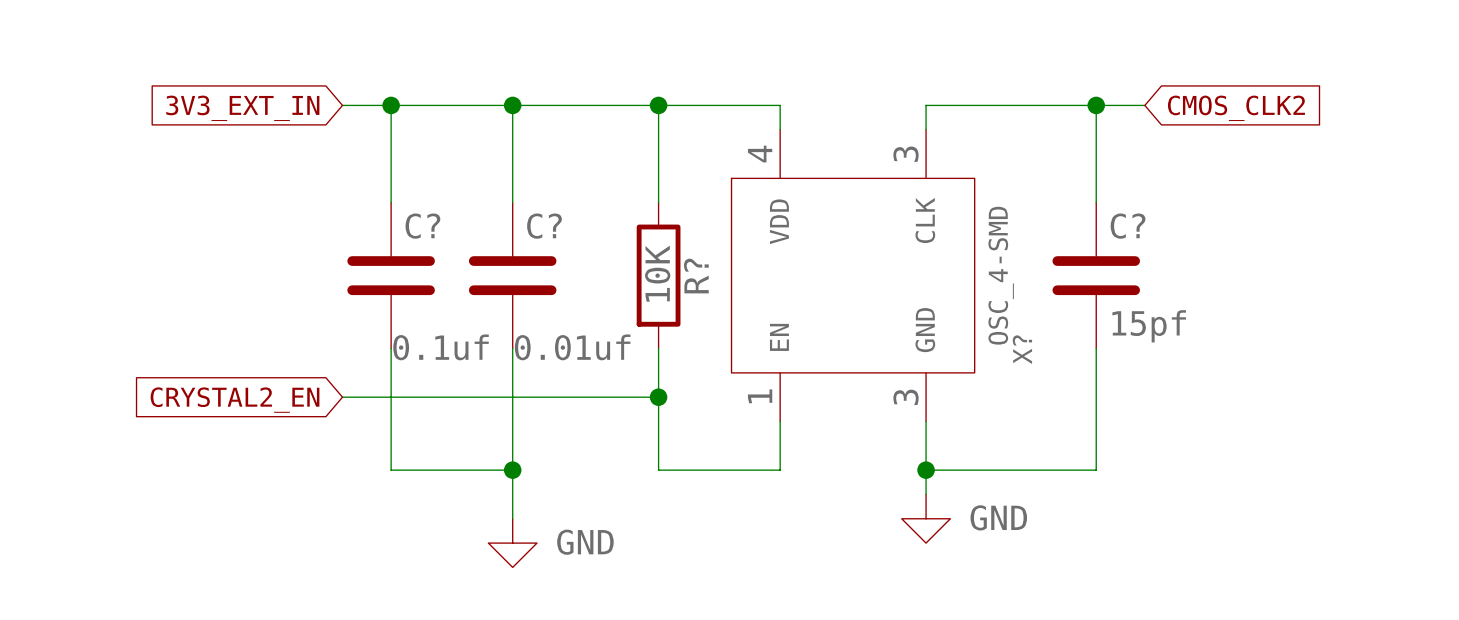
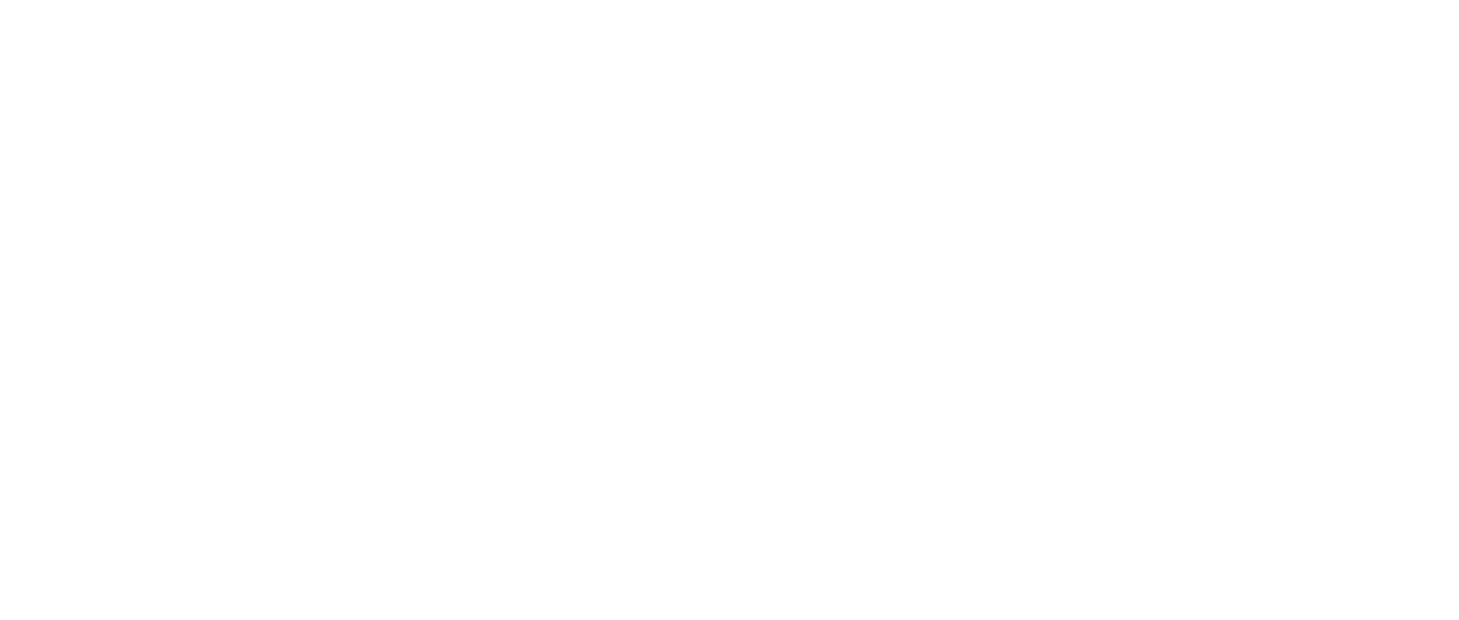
wire: (342, 105) (780, 105) (780, 129) -> none
wire: (391, 105) (391, 202) -> none
junction: (391, 105) -> none
wire: (512, 105) (512, 202) -> none
junction: (512, 105) -> none
wire: (658, 105) (658, 202) -> none
junction: (658, 105) -> none
wire: (1096, 105) (1096, 202) -> none
junction: (1096, 105) -> none
wire: (1144, 105) (926, 105) (926, 129) -> none
global label: 3V3_EXT_IN (242, 108) -> none
global label: CMOS_CLK2 (1236, 108) -> none
C?: 0.1uf (391, 275) -> none
C?: 0.01uf (512, 275) -> none
R?: 10K (658, 275) -> none
X?: OSC_4-SMD (853, 275) -> none
C?: 15pf (1096, 275) -> none
wire: (391, 348) (391, 470) (512, 470) -> none
wire: (512, 348) (512, 518) -> none
wire: (658, 348) (658, 470) (780, 470) (780, 421) -> none
wire: (1096, 348) (1096, 470) (926, 470) -> none
wire: (342, 397) (658, 397) -> none
junction: (658, 397) -> none
global label: CRYSTAL2_EN (235, 400) -> none
wire: (926, 421) (926, 494) -> none
junction: (512, 470) -> none
junction: (926, 470) -> none
power symbol: GND (926, 518) -> none
power symbol: GND (512, 543) -> none

